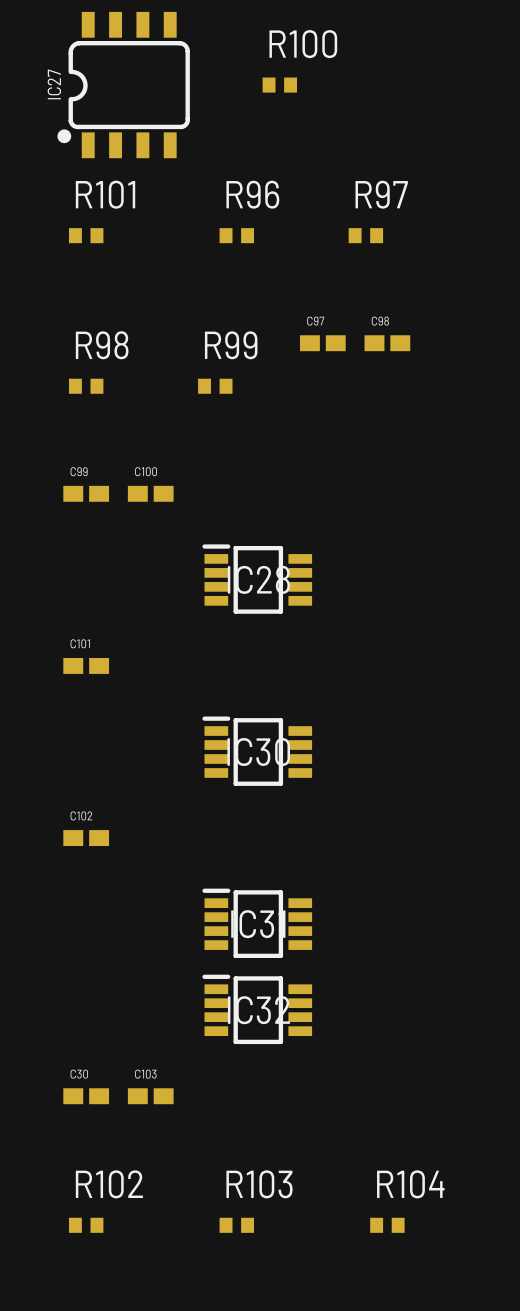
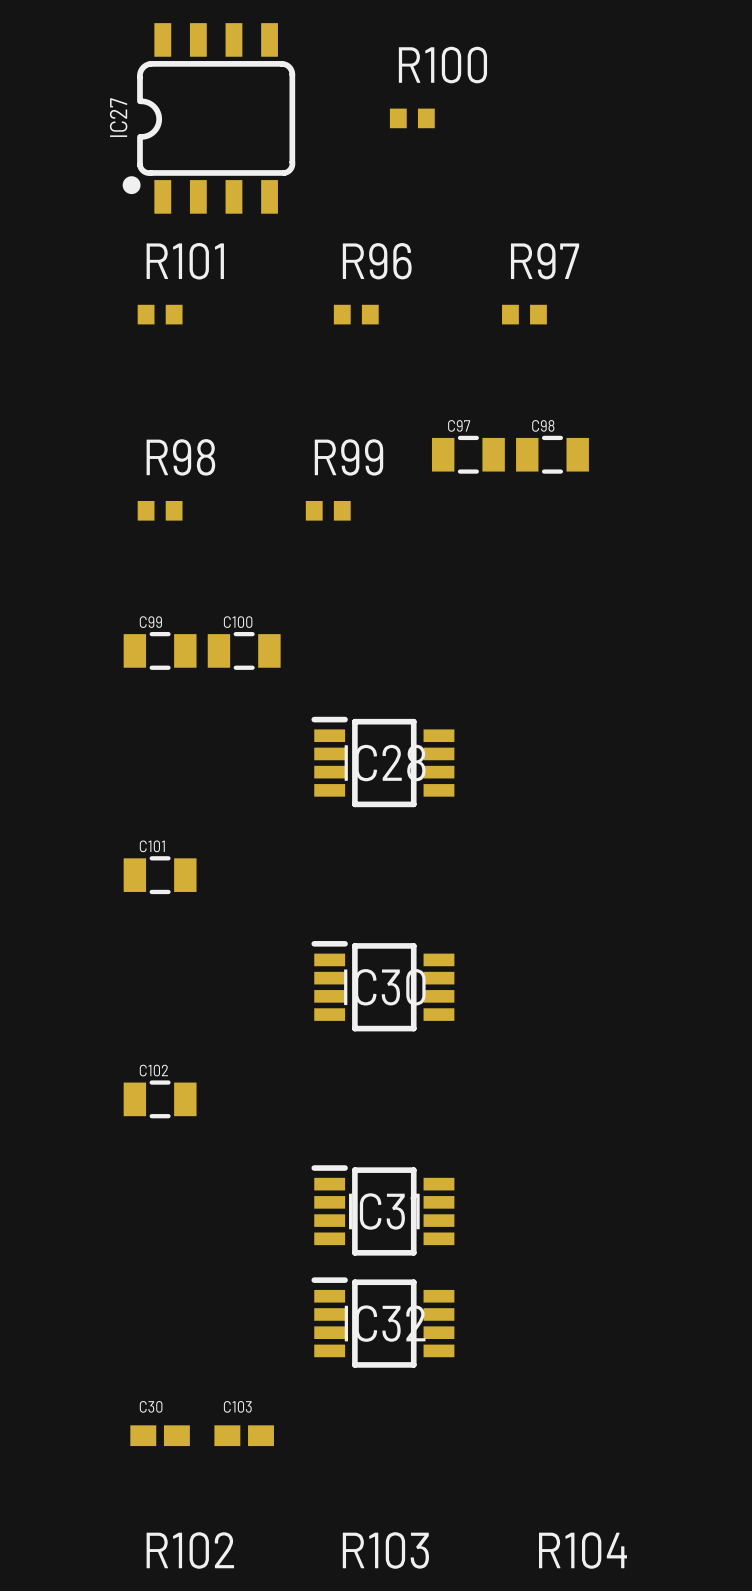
C97 footprint: [299, 335, 346, 352] -> [431, 435, 505, 474]
C98 footprint: [364, 335, 411, 352] -> [516, 435, 589, 474]
C99 footprint: [63, 485, 110, 502] -> [123, 631, 197, 670]
C100 footprint: [127, 485, 174, 502] -> [207, 631, 281, 670]
C101 footprint: [63, 657, 110, 674] -> [123, 856, 197, 895]
C102 footprint: [63, 830, 110, 847] -> [123, 1080, 197, 1119]

